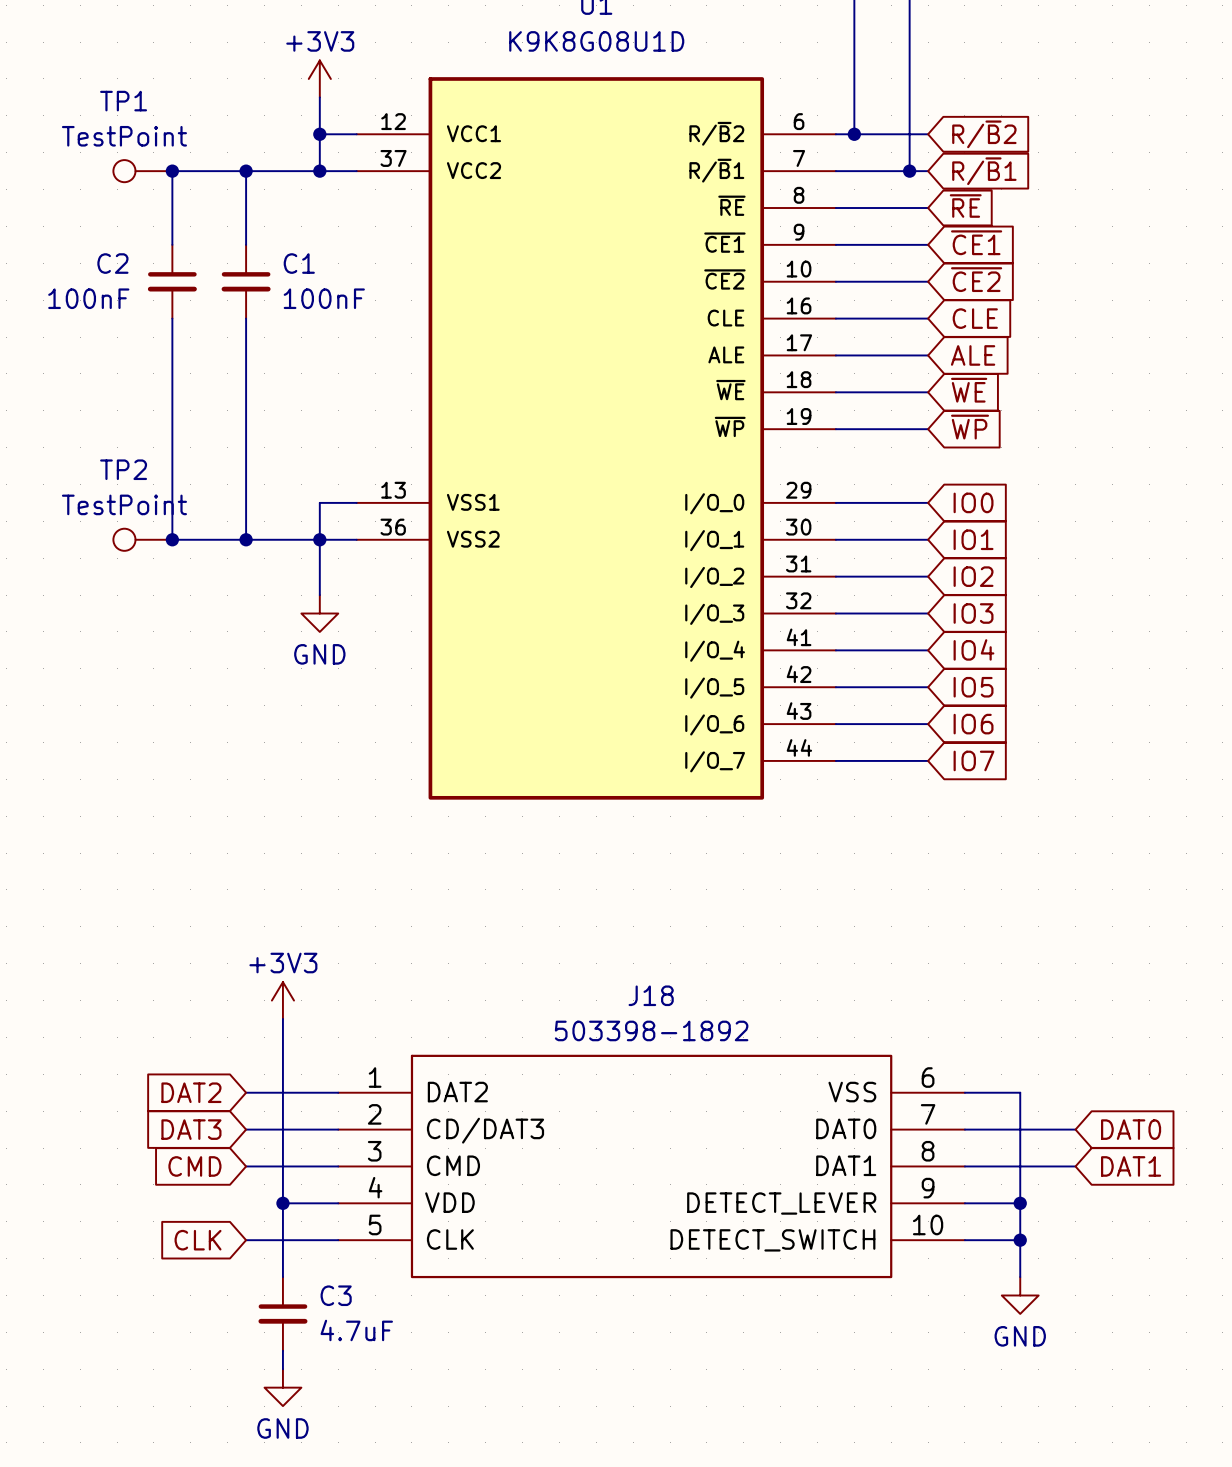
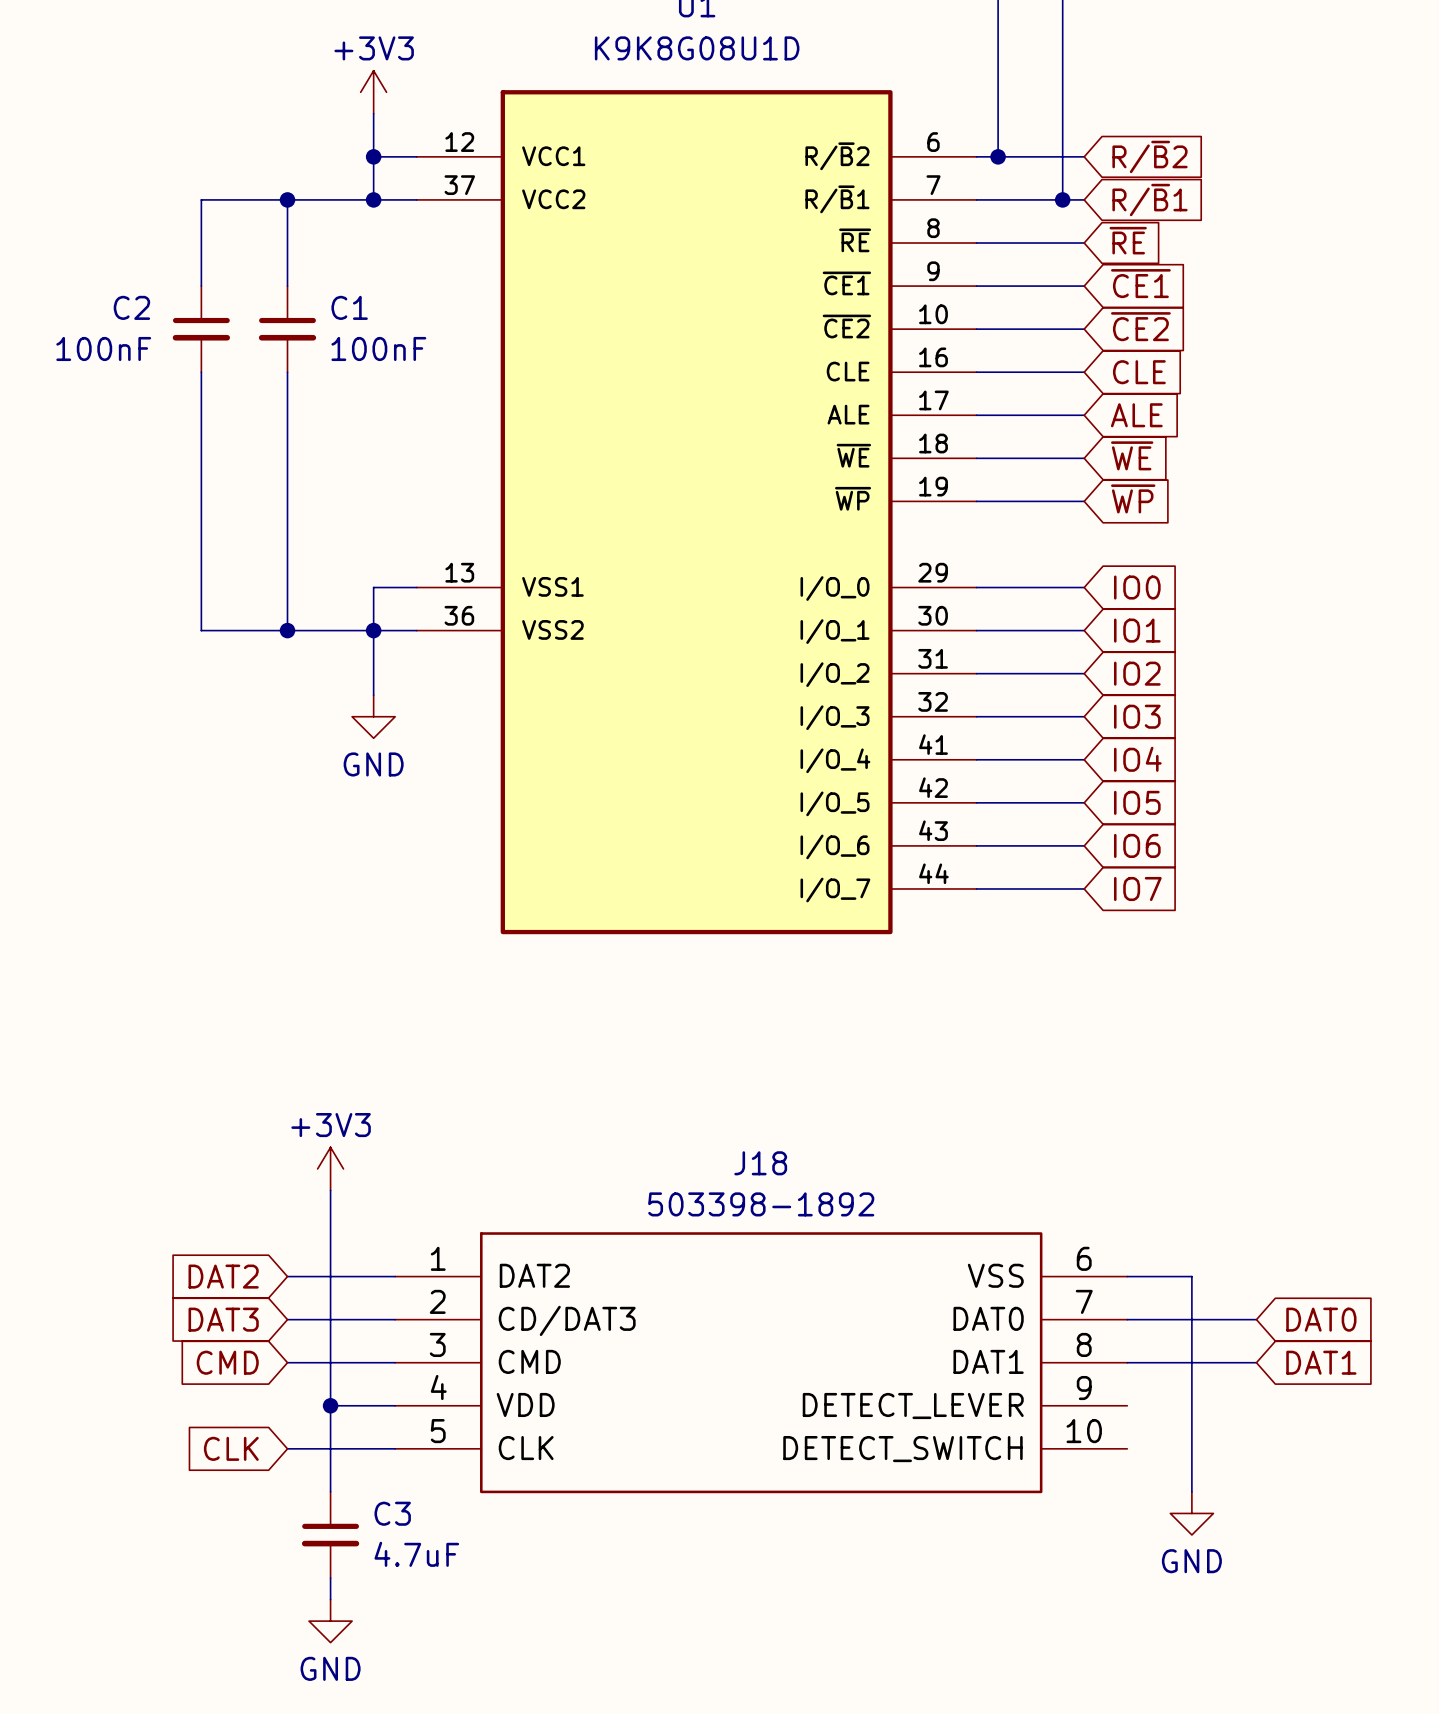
TP1: TestPoint (142, 171) -> none
junction: (172, 171) -> none
TP2: TestPoint (142, 539) -> none
junction: (172, 539) -> none
wire: (964, 1203) (1020, 1203) -> none
junction: (1020, 1203) -> none
wire: (964, 1240) (1020, 1240) -> none
junction: (1020, 1240) -> none

